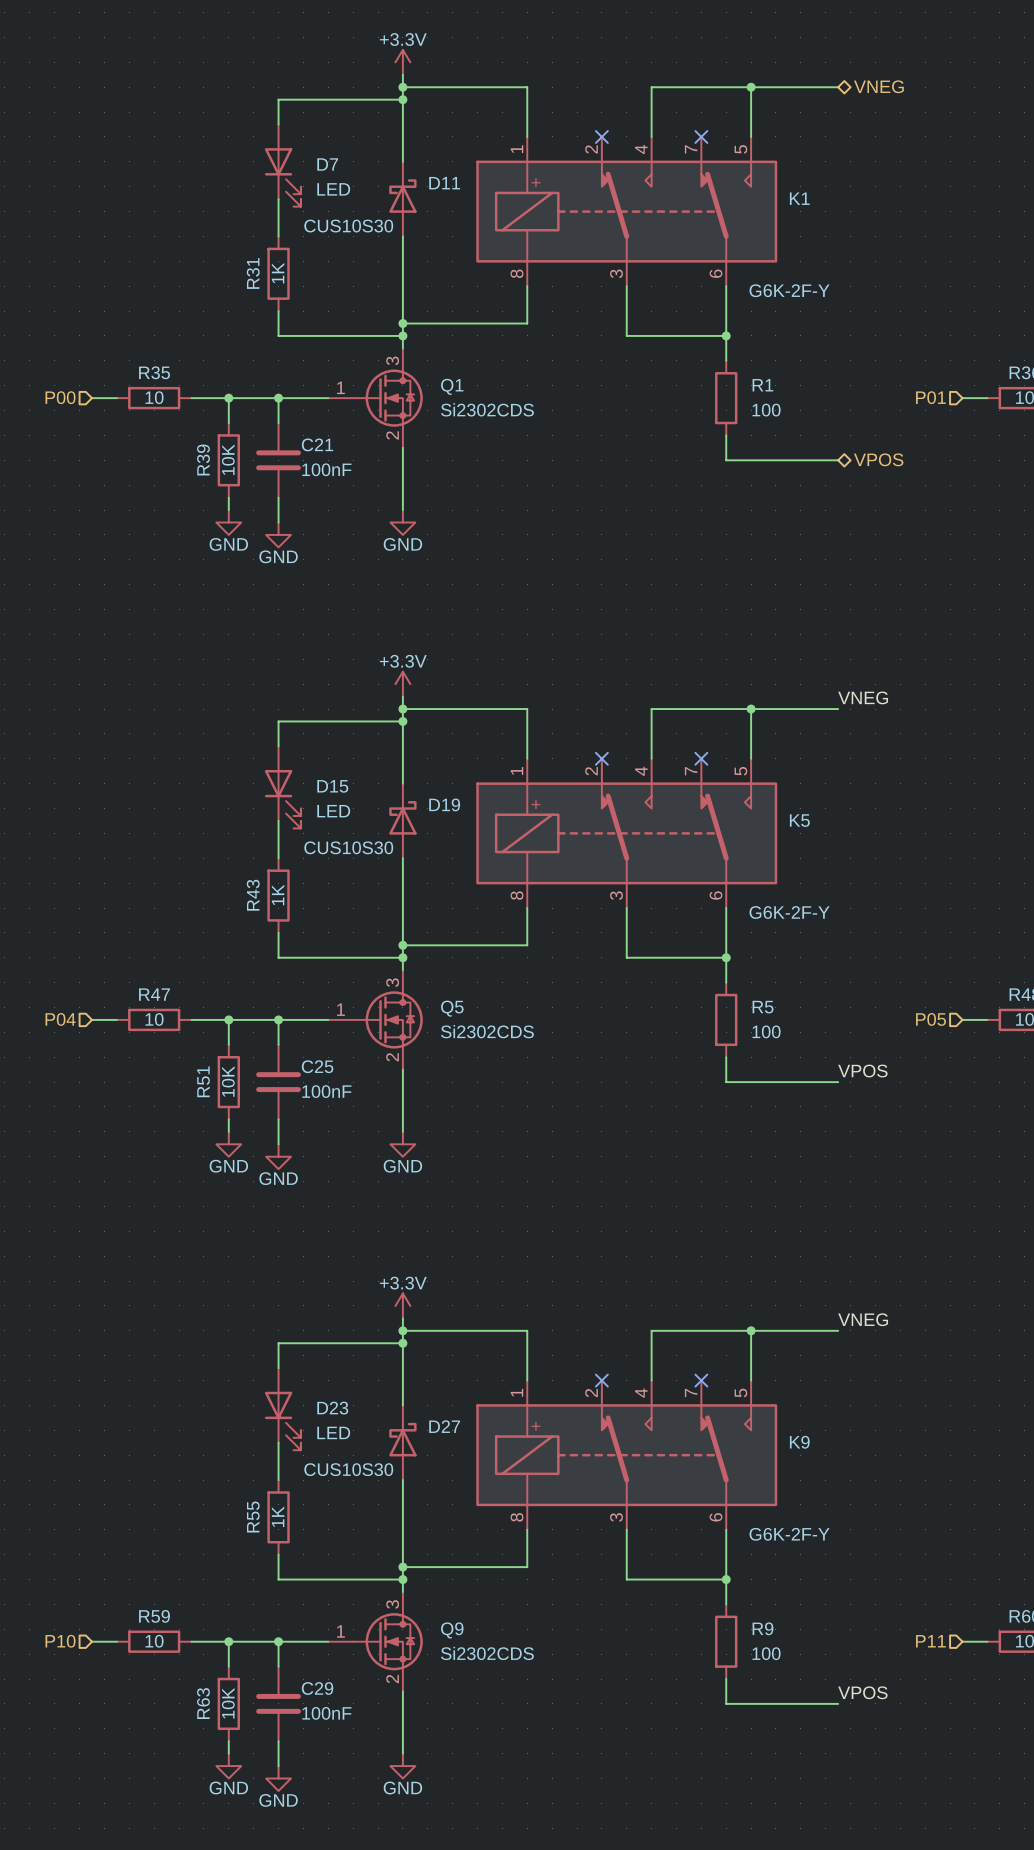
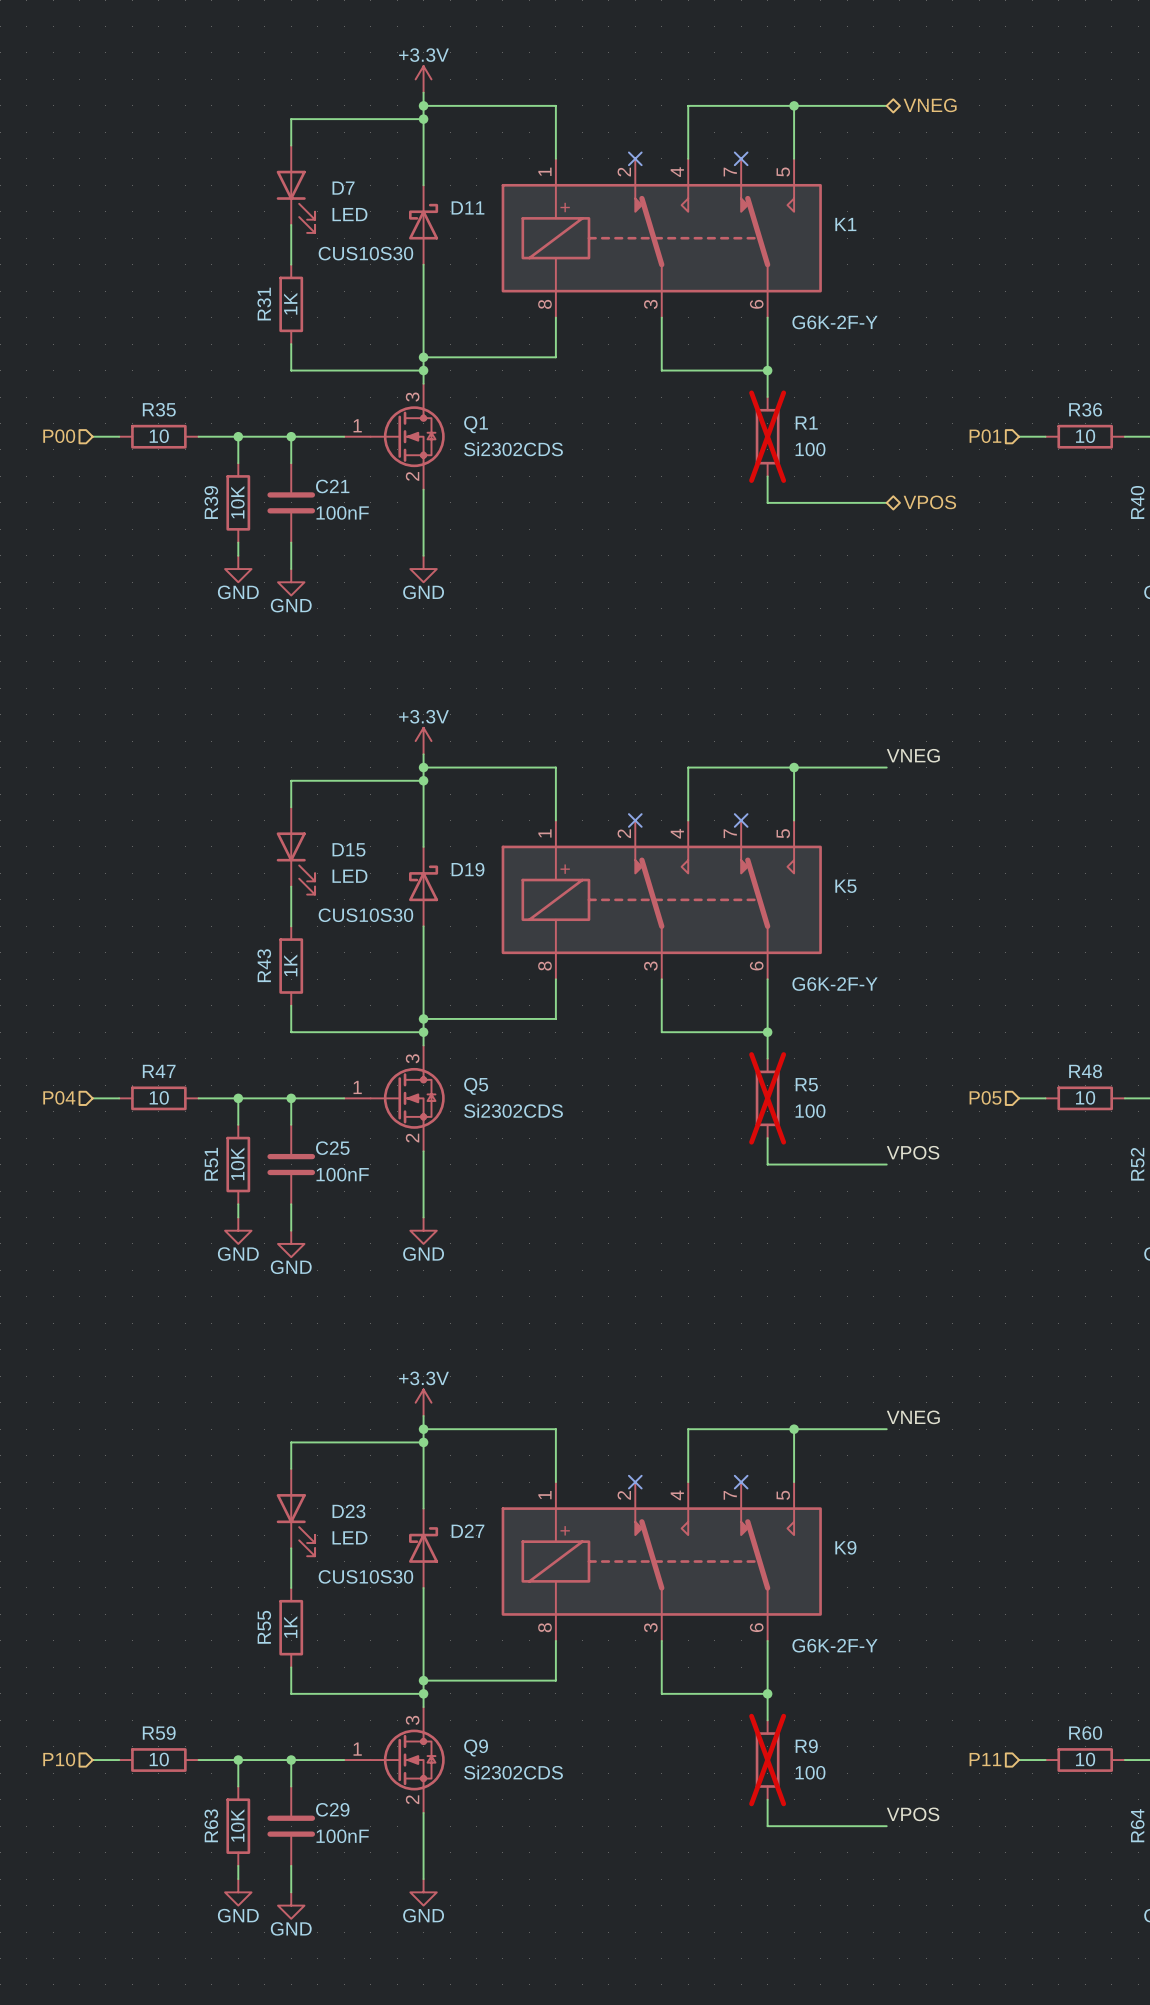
R1 do-not-place cross: none -> (767, 436)
R5 do-not-place cross: none -> (767, 1098)
R9 do-not-place cross: none -> (767, 1760)

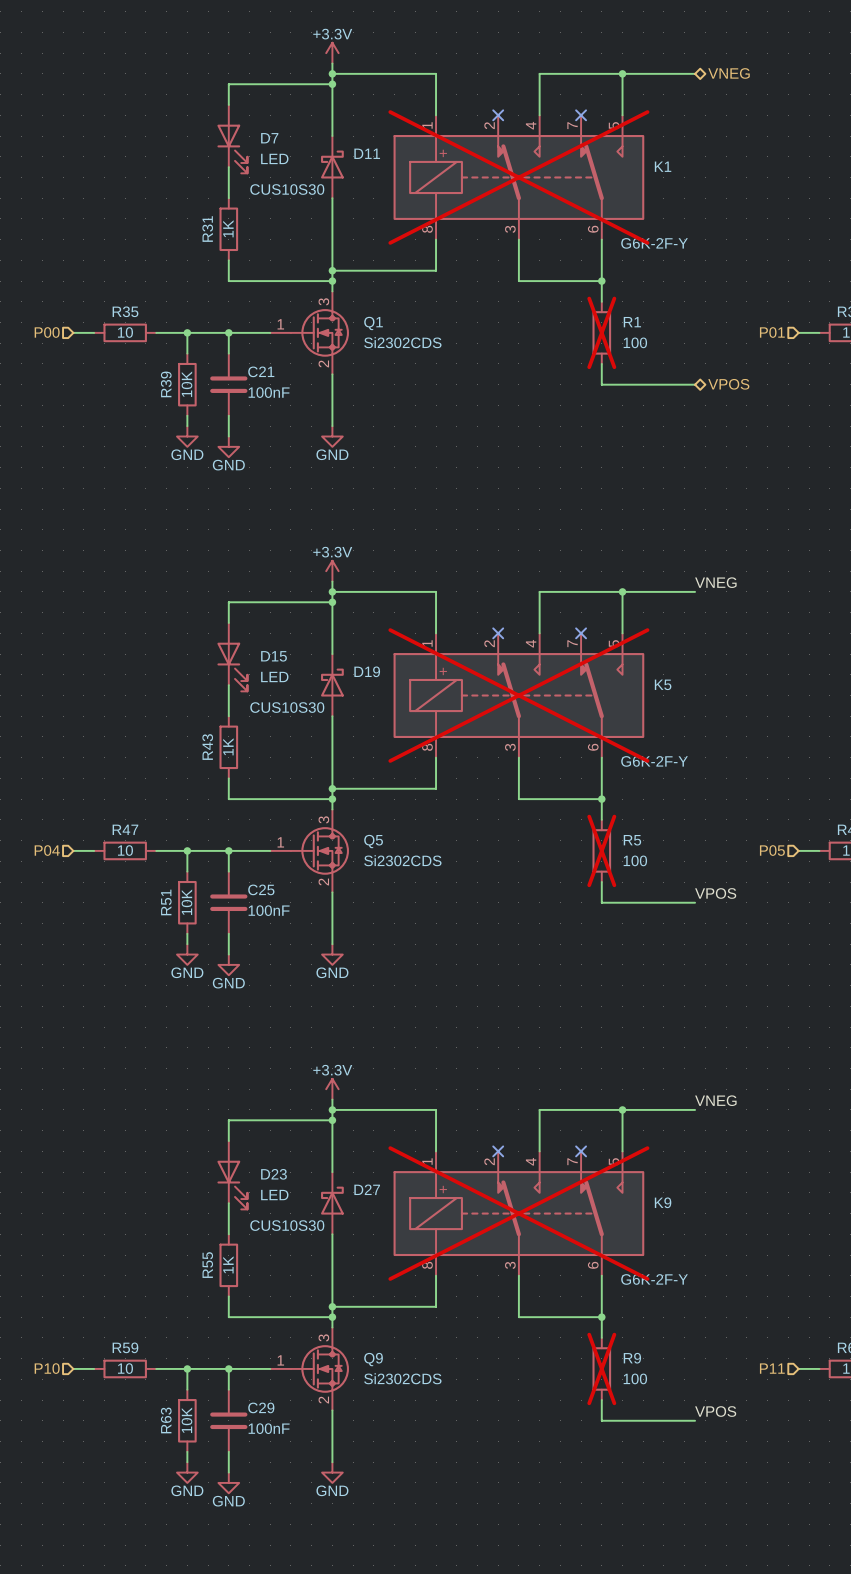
K1 do-not-place cross: none -> (518, 177)
K5 do-not-place cross: none -> (518, 695)
K9 do-not-place cross: none -> (518, 1213)

